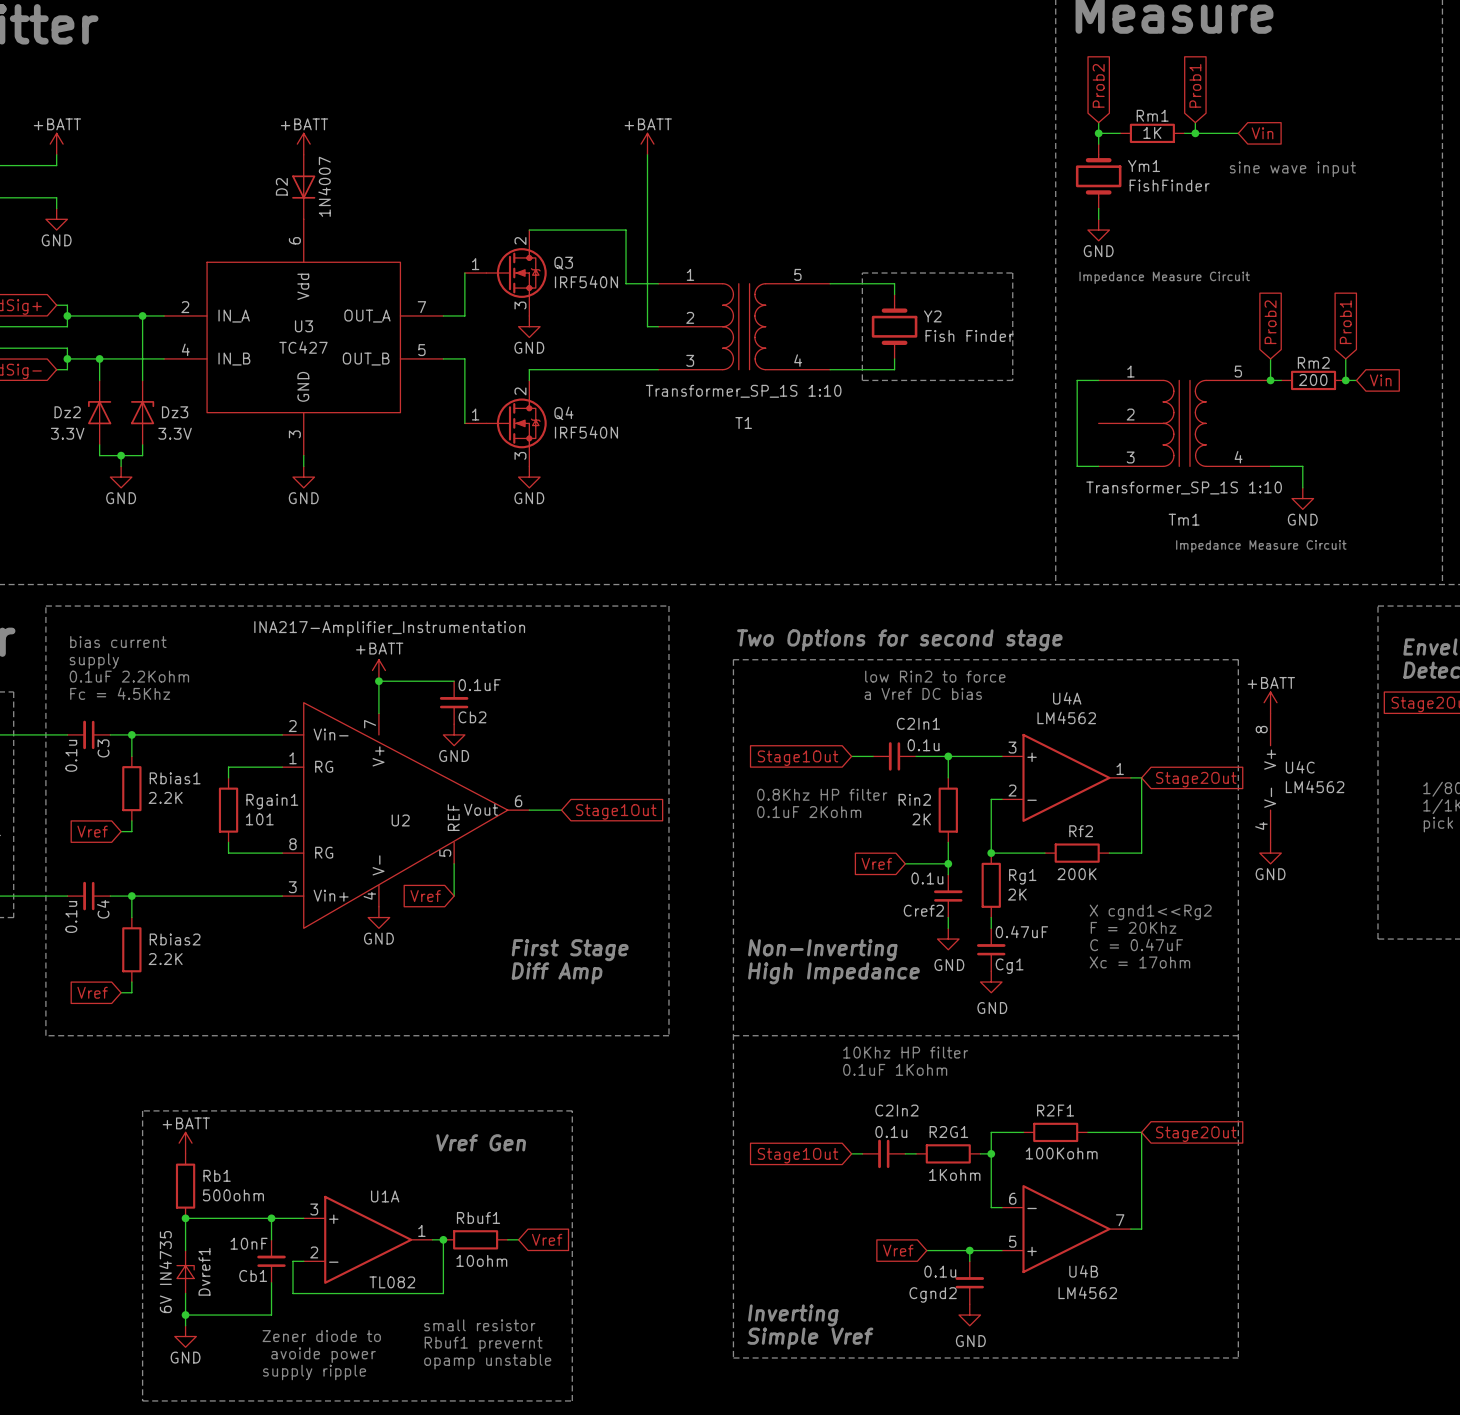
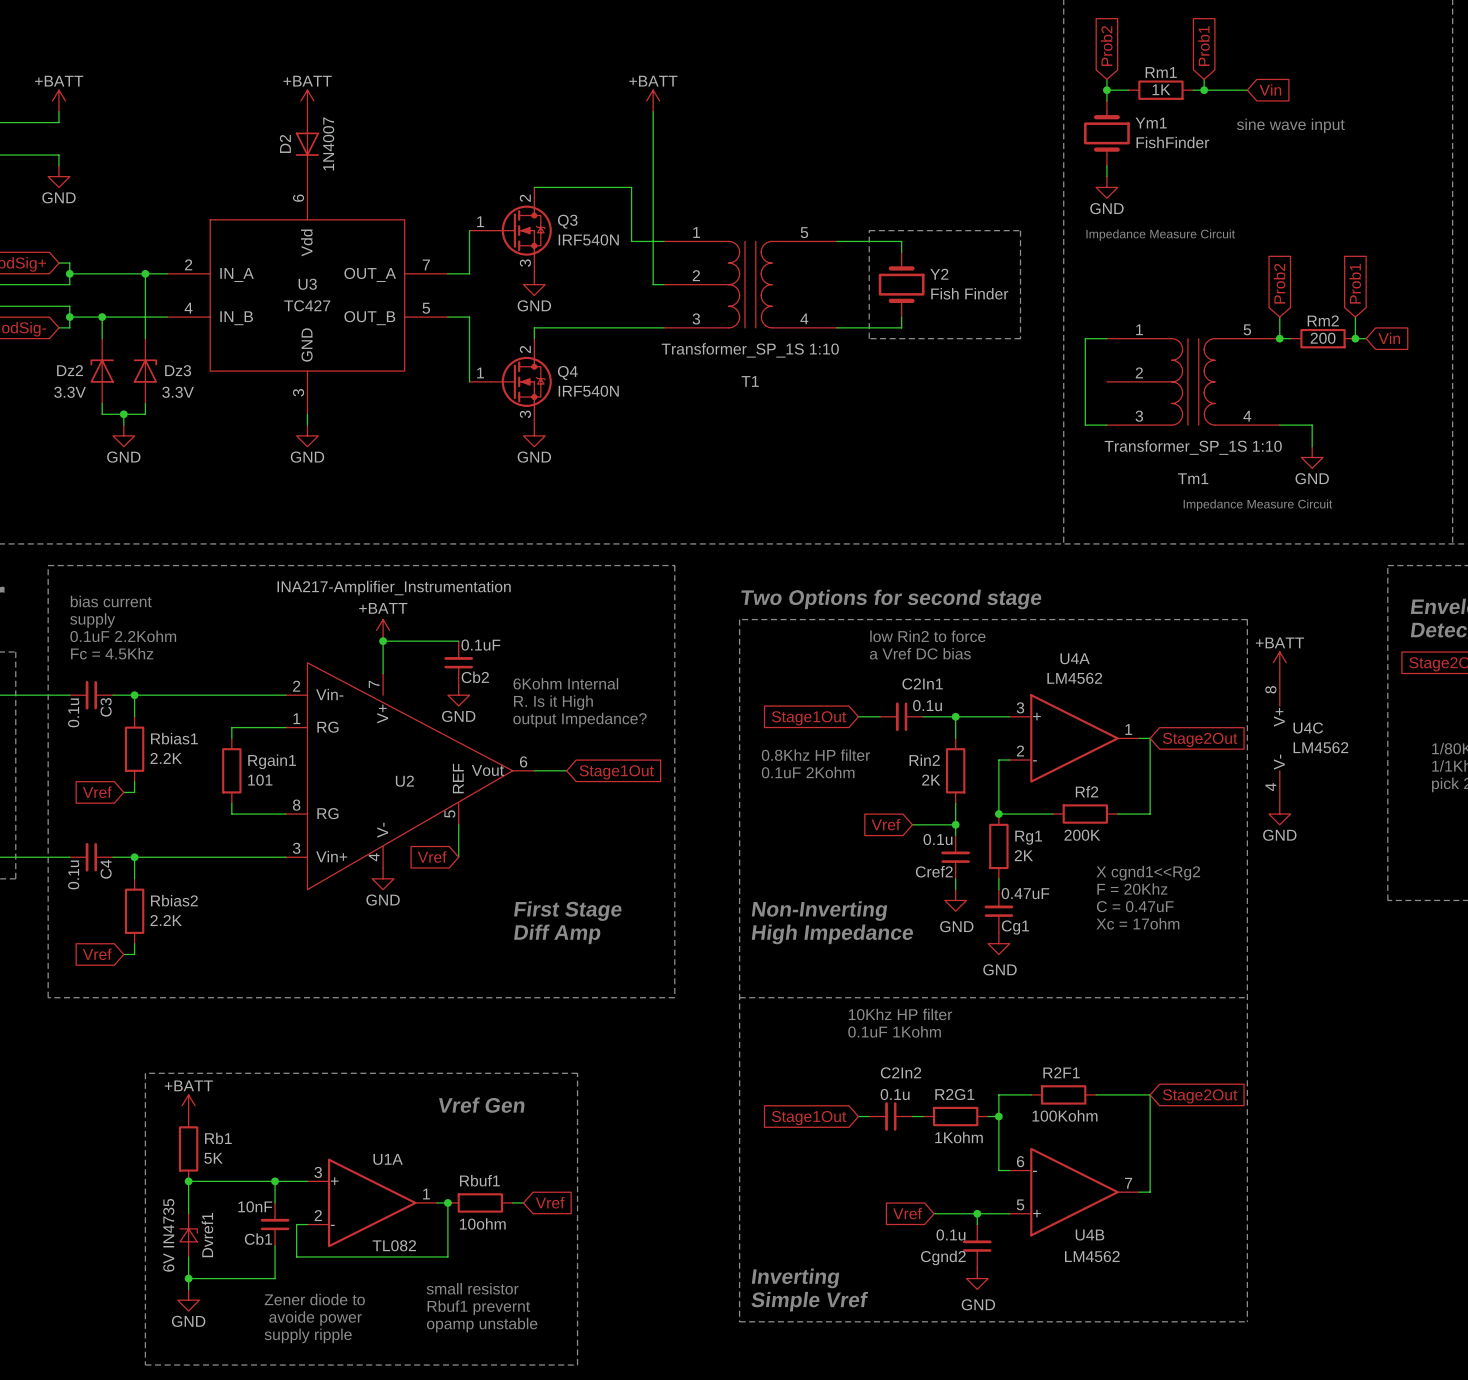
text: none -> 6Kohm Internal (565, 683)
text: none -> R. Is it High (553, 702)
text: none -> output Impedance? (579, 720)
Rb1 value: 500ohm (233, 1195) -> 5K (213, 1158)

